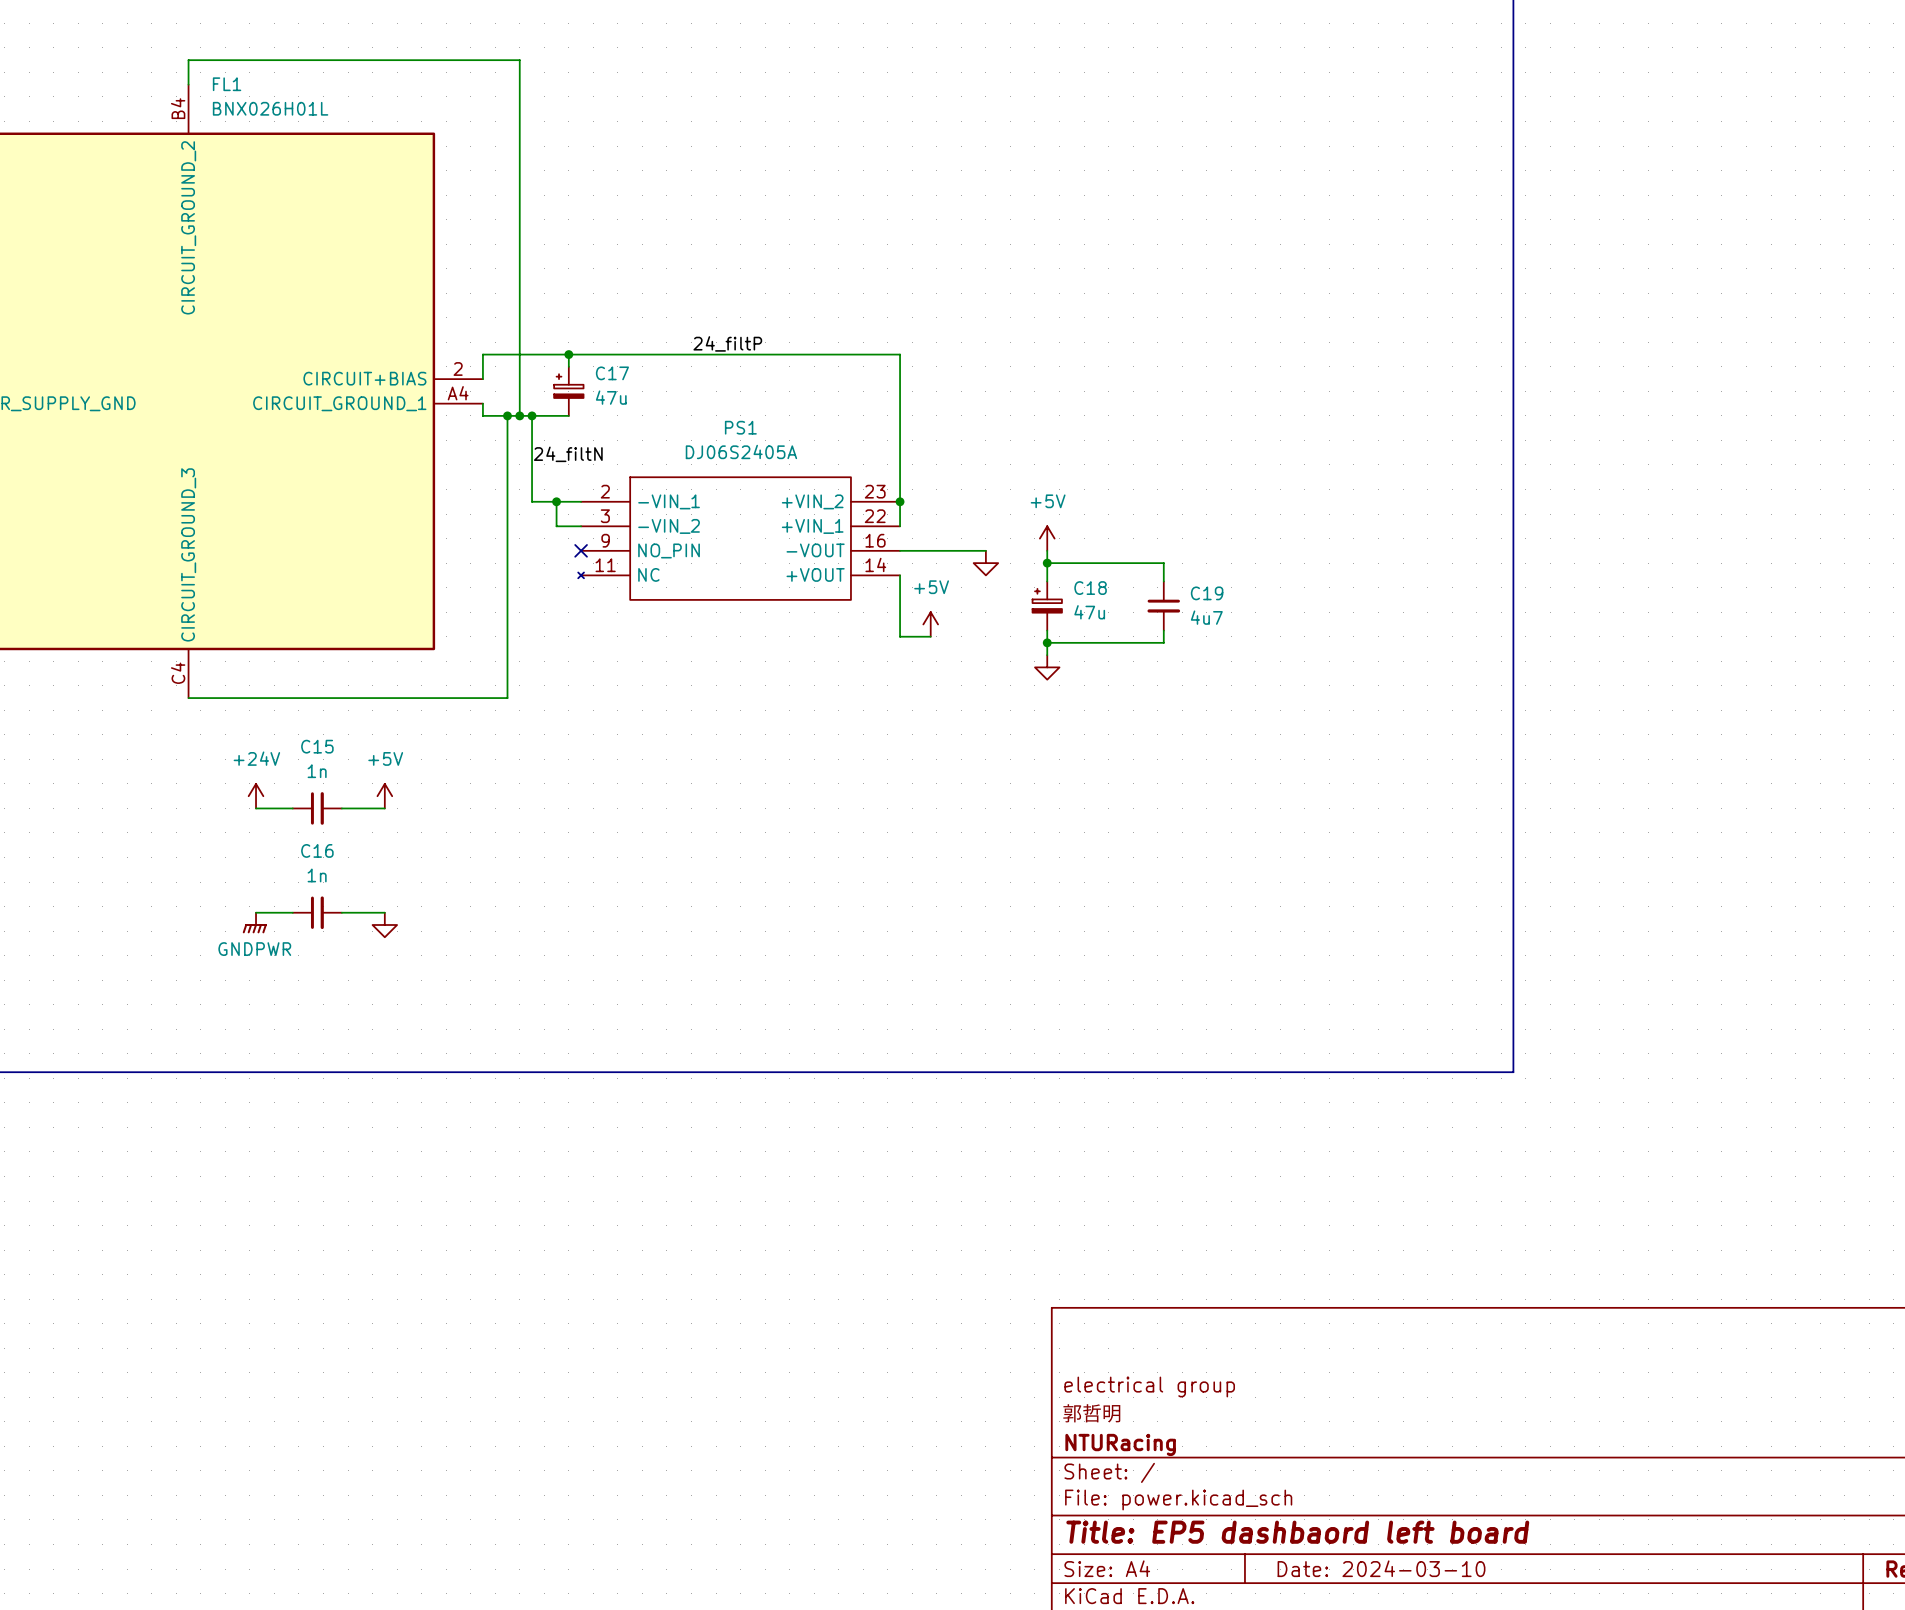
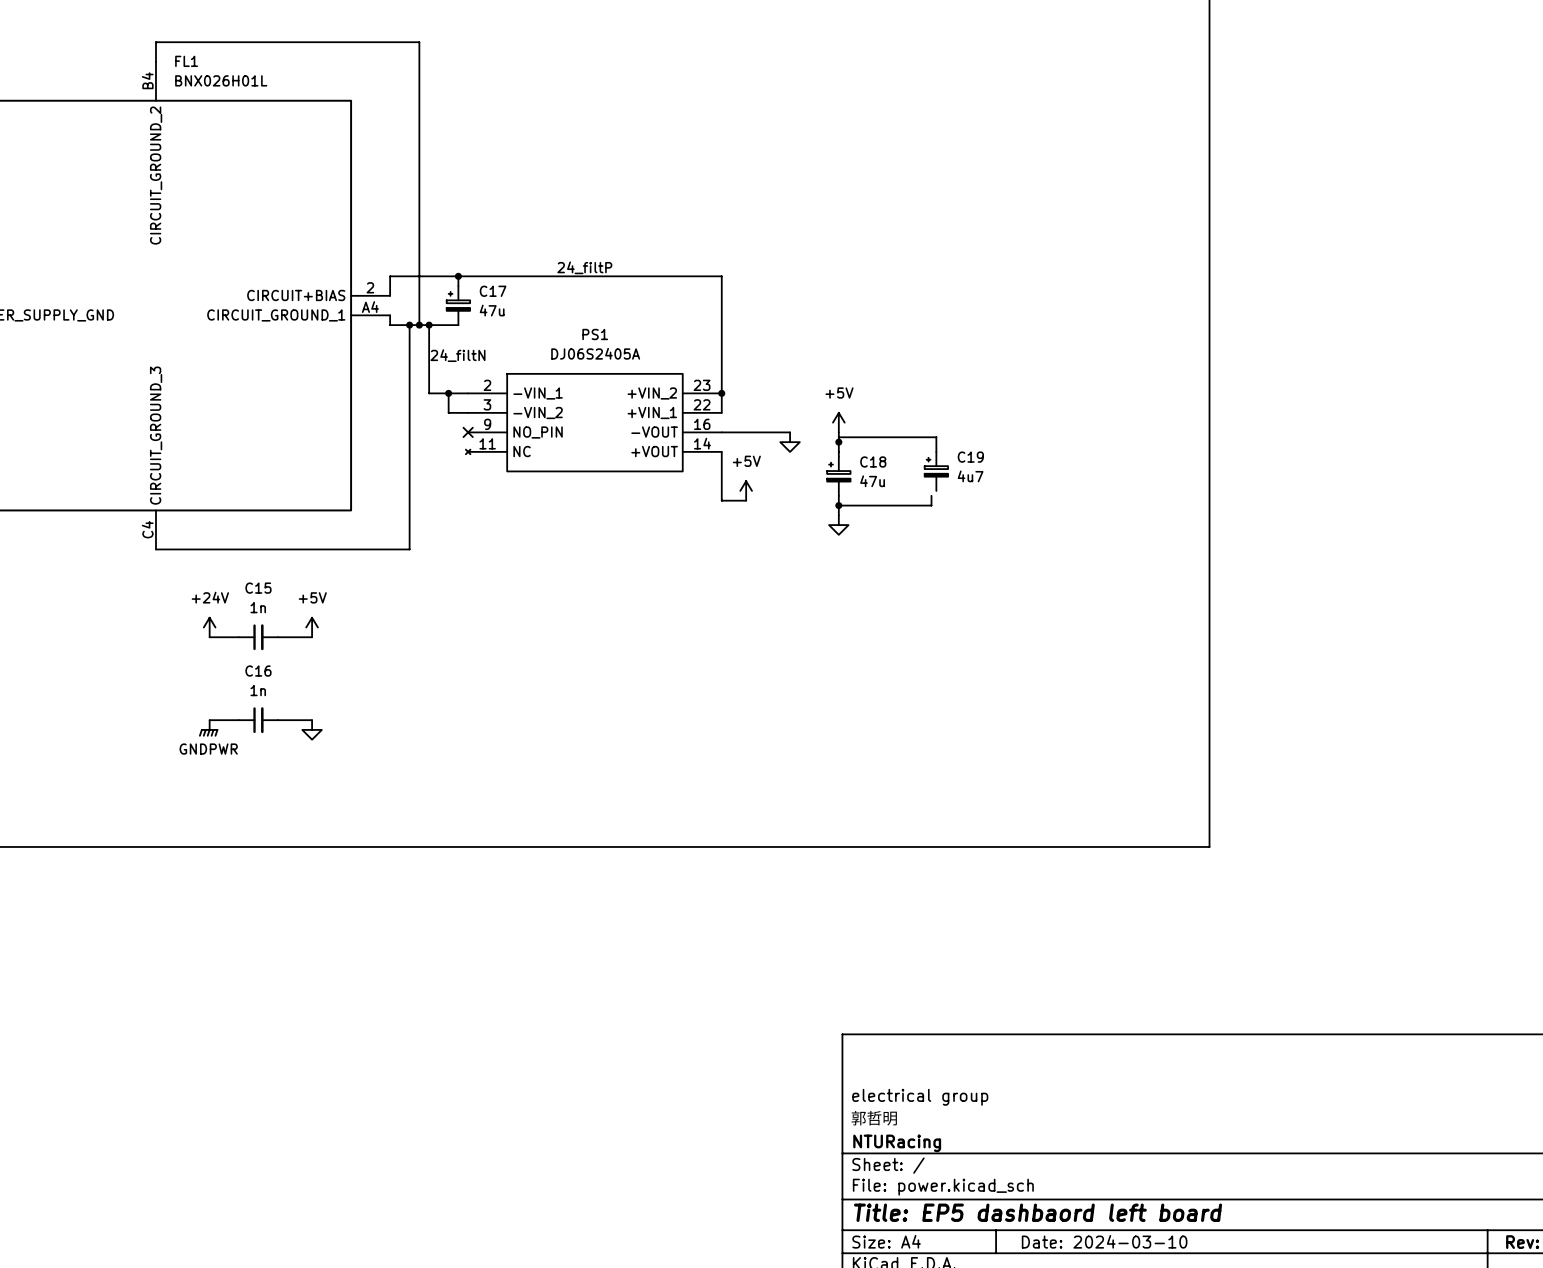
wire: none -> (838, 437) (936, 437) (936, 451)
wire: (1047, 563) (1163, 563) (1163, 581) -> none
C19 symbol: [1147, 581, 1181, 631] -> [924, 451, 949, 491]

